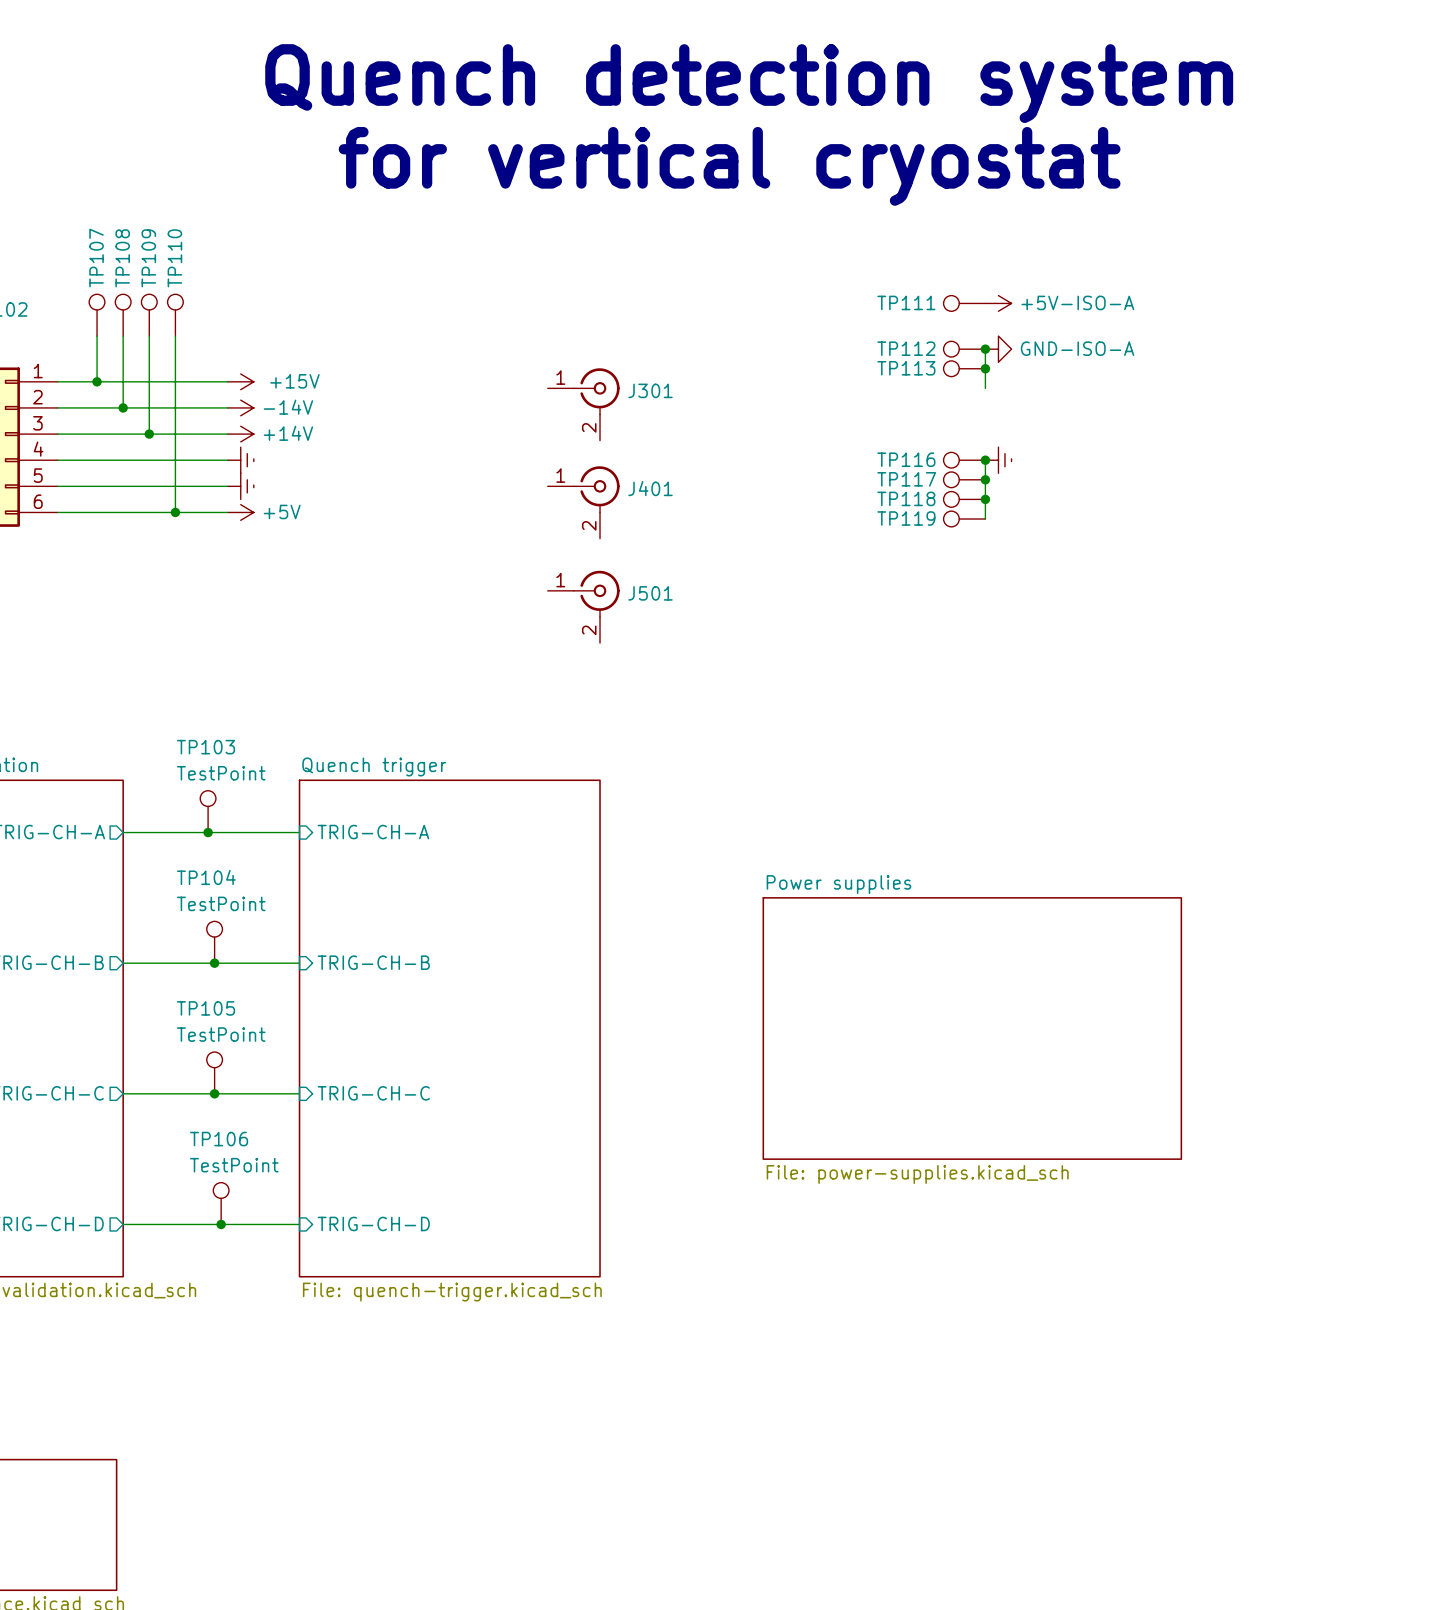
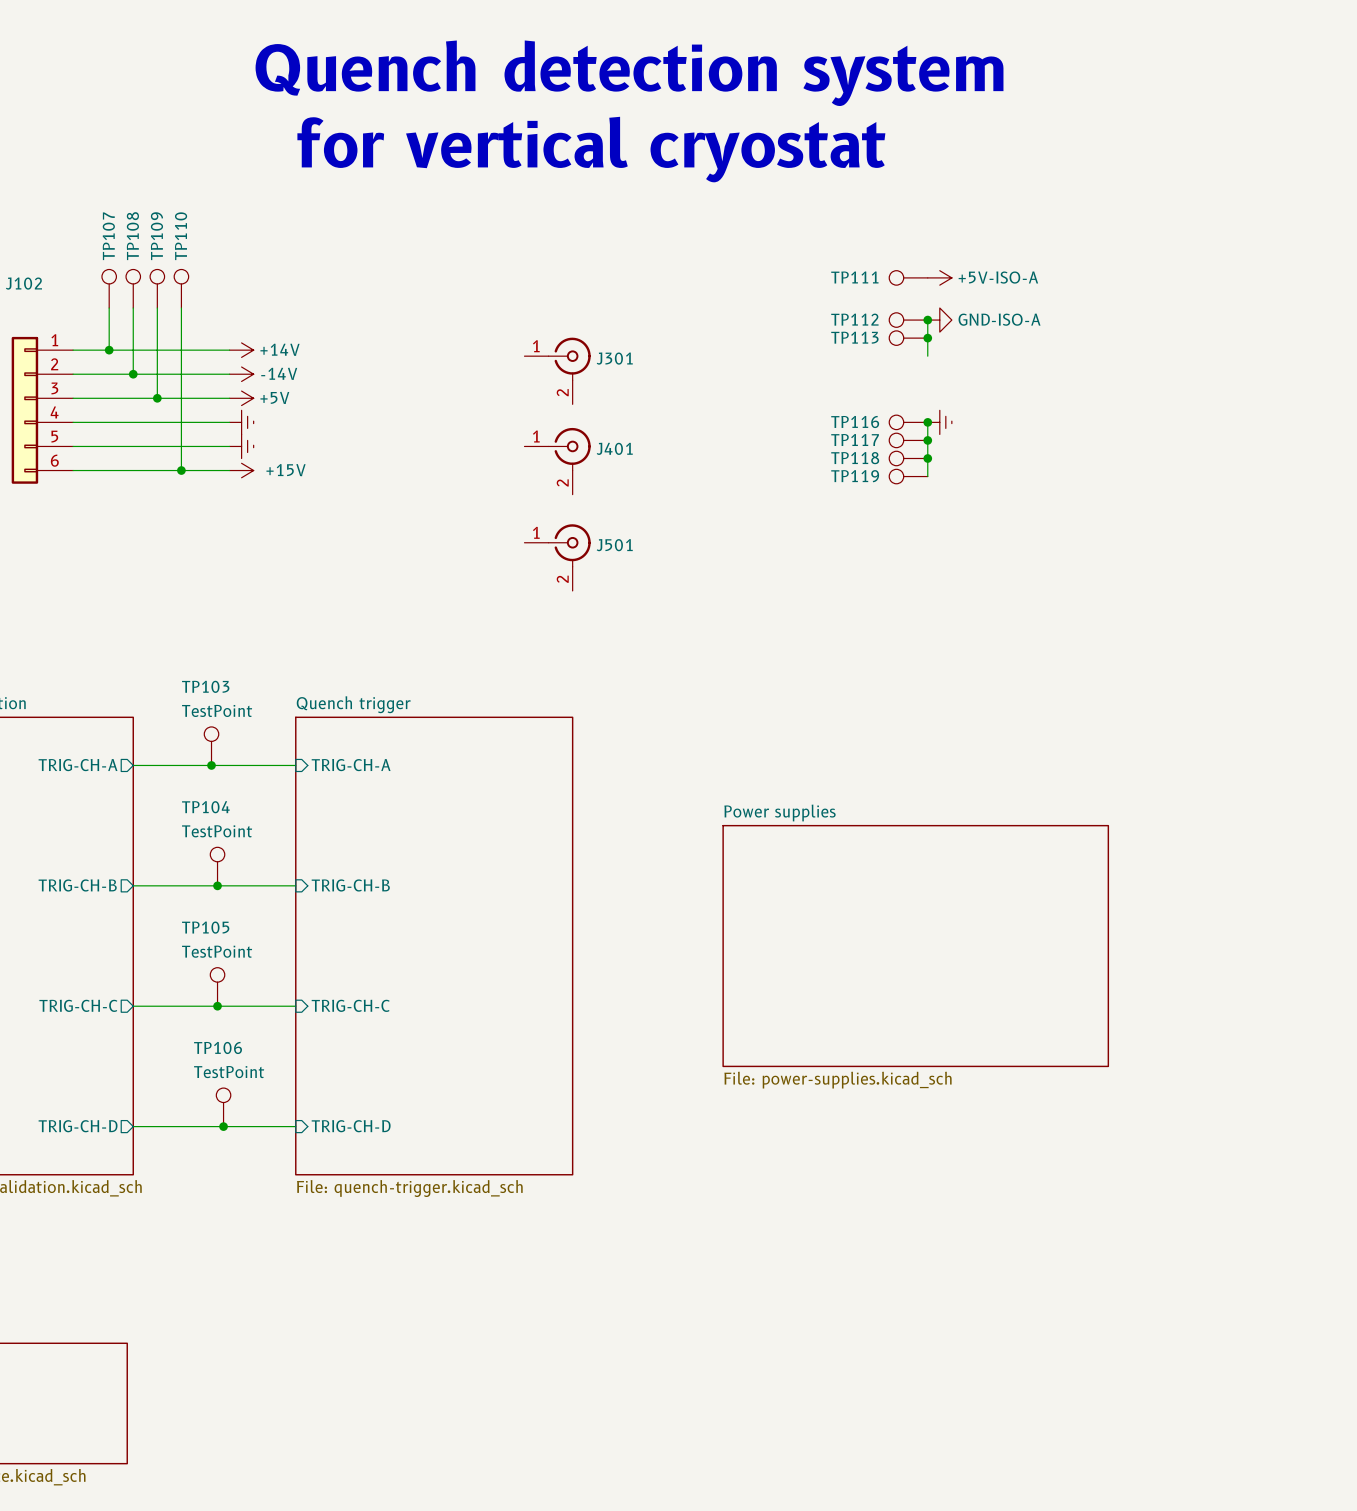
power symbol: +15V (240, 381) -> +14V (241, 350)
power symbol: +14V (240, 434) -> +5V (241, 398)
power symbol: +5V (240, 512) -> +15V (241, 470)

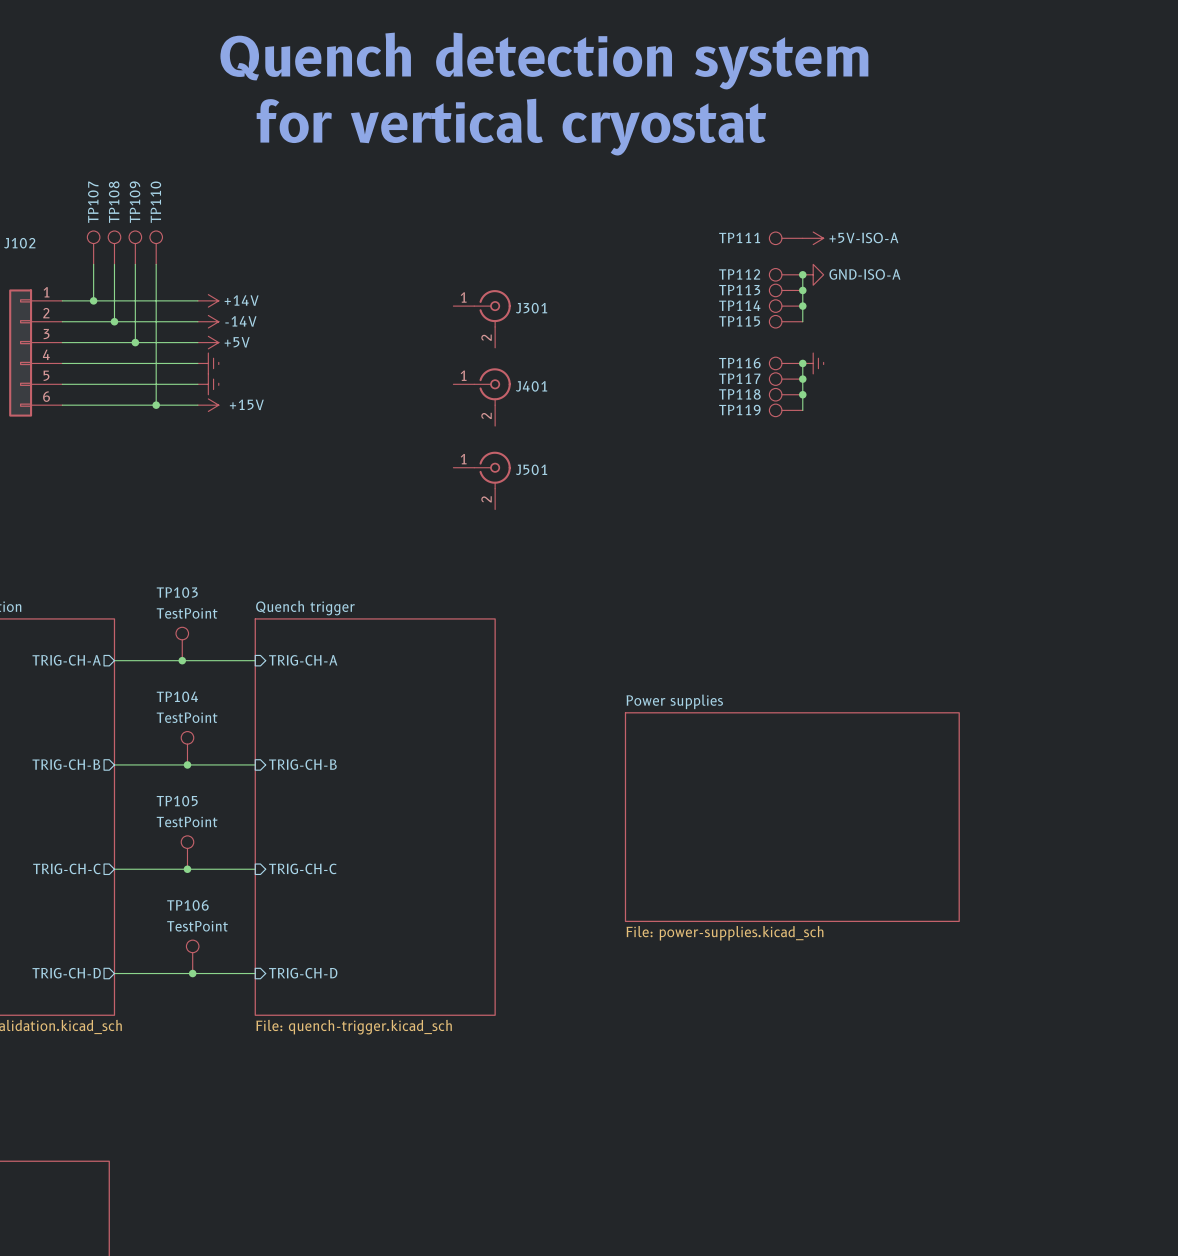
TP114: none -> (786, 306)
wire: none -> (802, 306) (802, 321)
junction: none -> (802, 306)
TP115: none -> (786, 321)

